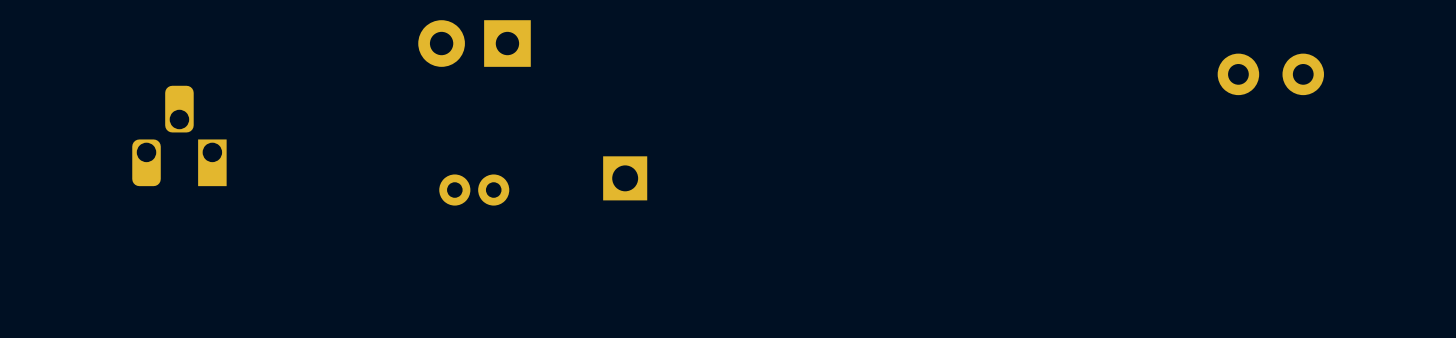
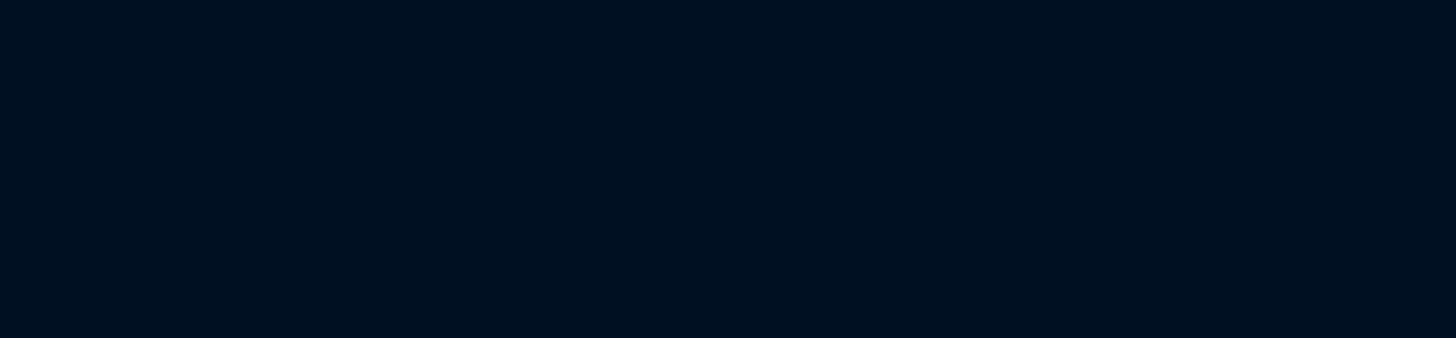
part: (474, 43) -> none
part: (1270, 74) -> none
part: (179, 135) -> none
part: (625, 178) -> none
part: (474, 190) -> none

